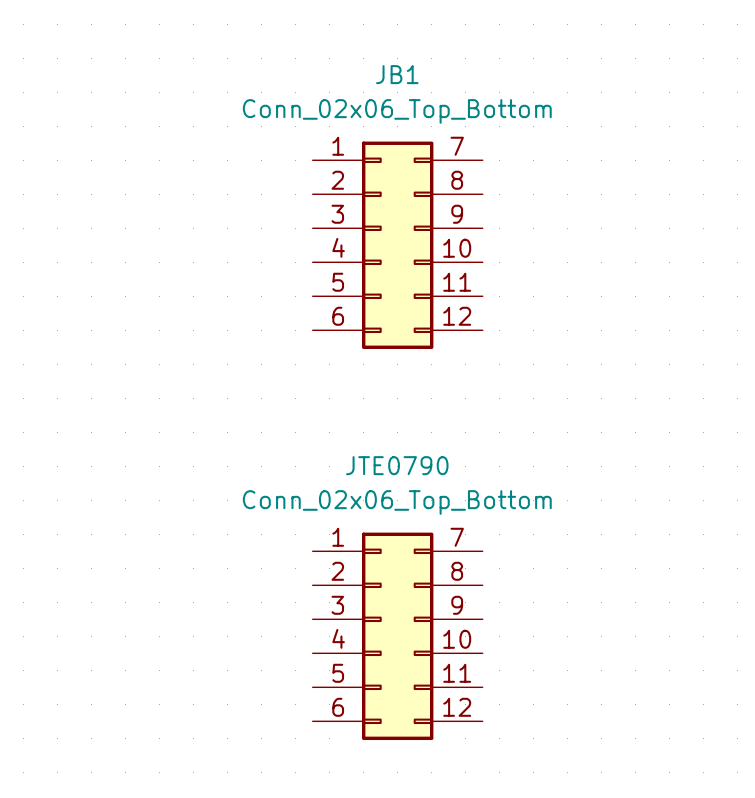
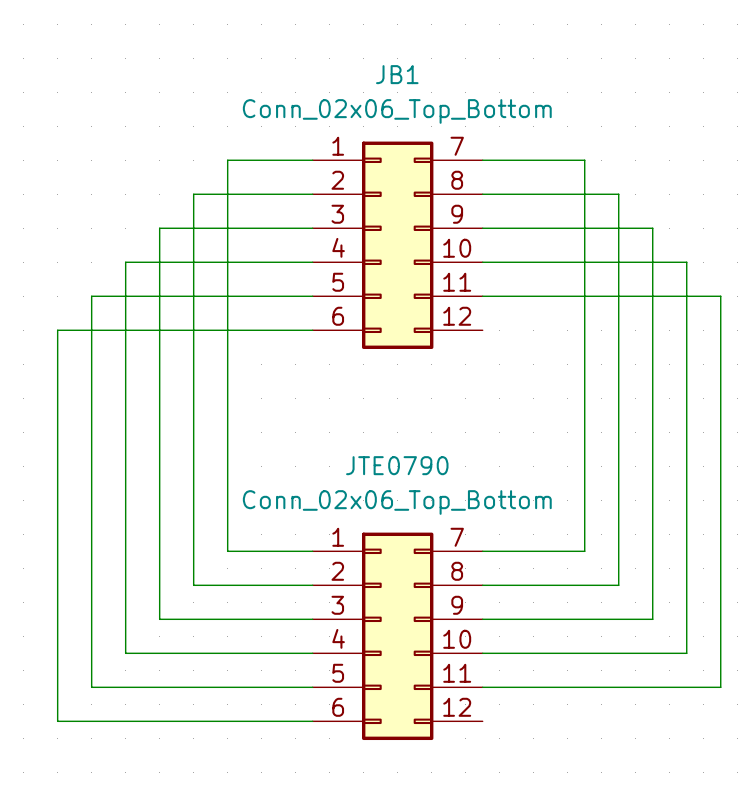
wire: none -> (312, 160) (227, 160) (227, 551) (312, 551)
wire: none -> (482, 160) (584, 160) (584, 551) (482, 551)
wire: none -> (312, 194) (193, 194) (193, 585) (312, 585)
wire: none -> (482, 194) (618, 194) (618, 585) (482, 585)
wire: none -> (312, 228) (159, 228) (159, 619) (312, 619)
wire: none -> (482, 228) (652, 228) (652, 619) (482, 619)
wire: none -> (312, 262) (125, 262) (125, 653) (312, 653)
wire: none -> (482, 262) (686, 262) (686, 653) (482, 653)
wire: none -> (312, 296) (91, 296) (91, 687) (312, 687)
wire: none -> (482, 296) (720, 296) (720, 687) (482, 687)
wire: none -> (312, 330) (57, 330) (57, 721) (312, 721)

